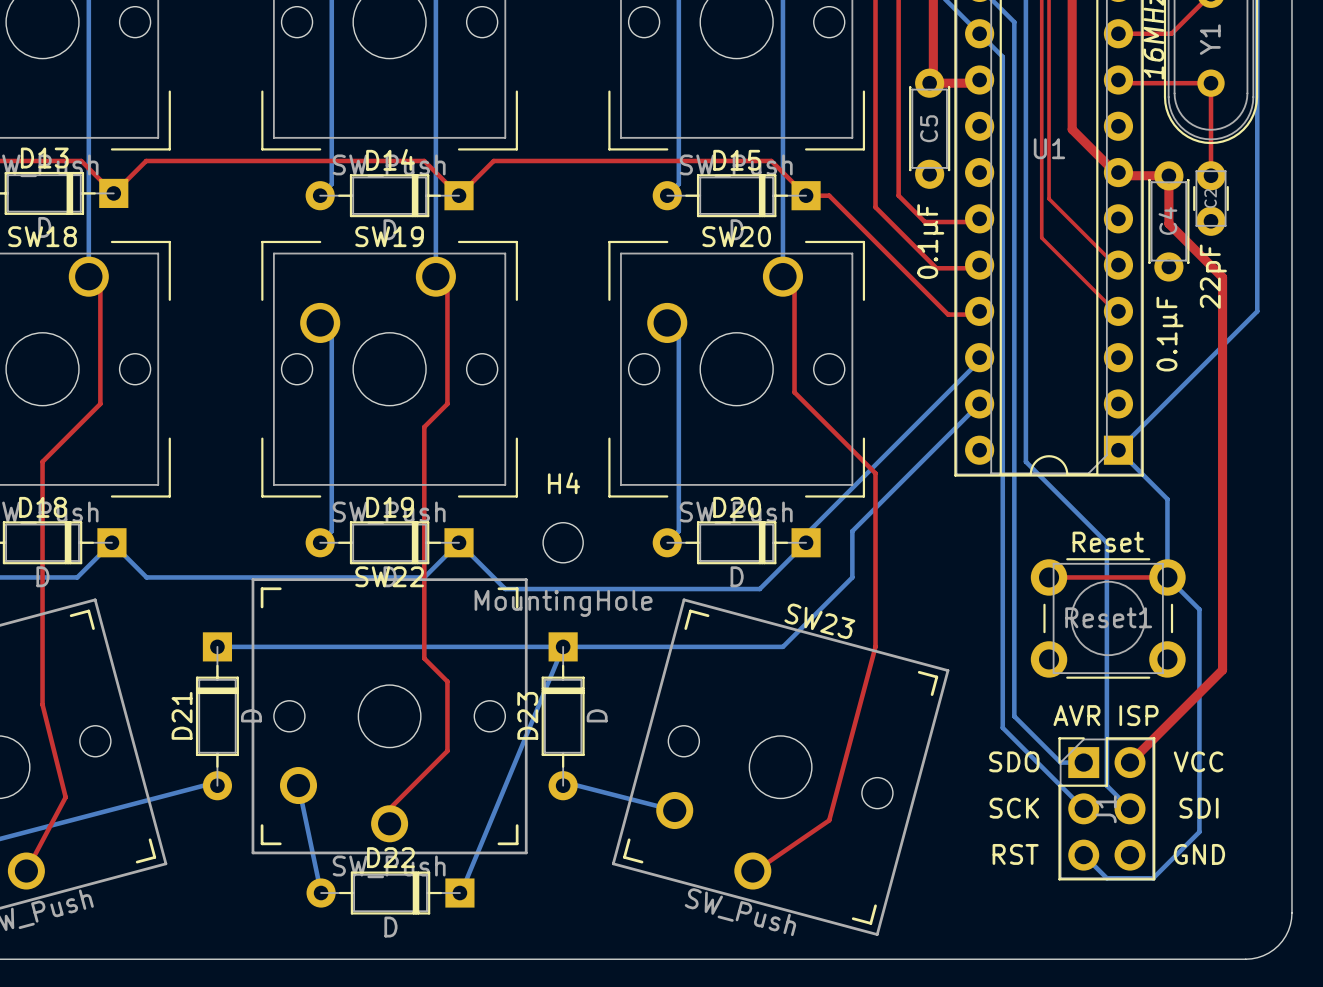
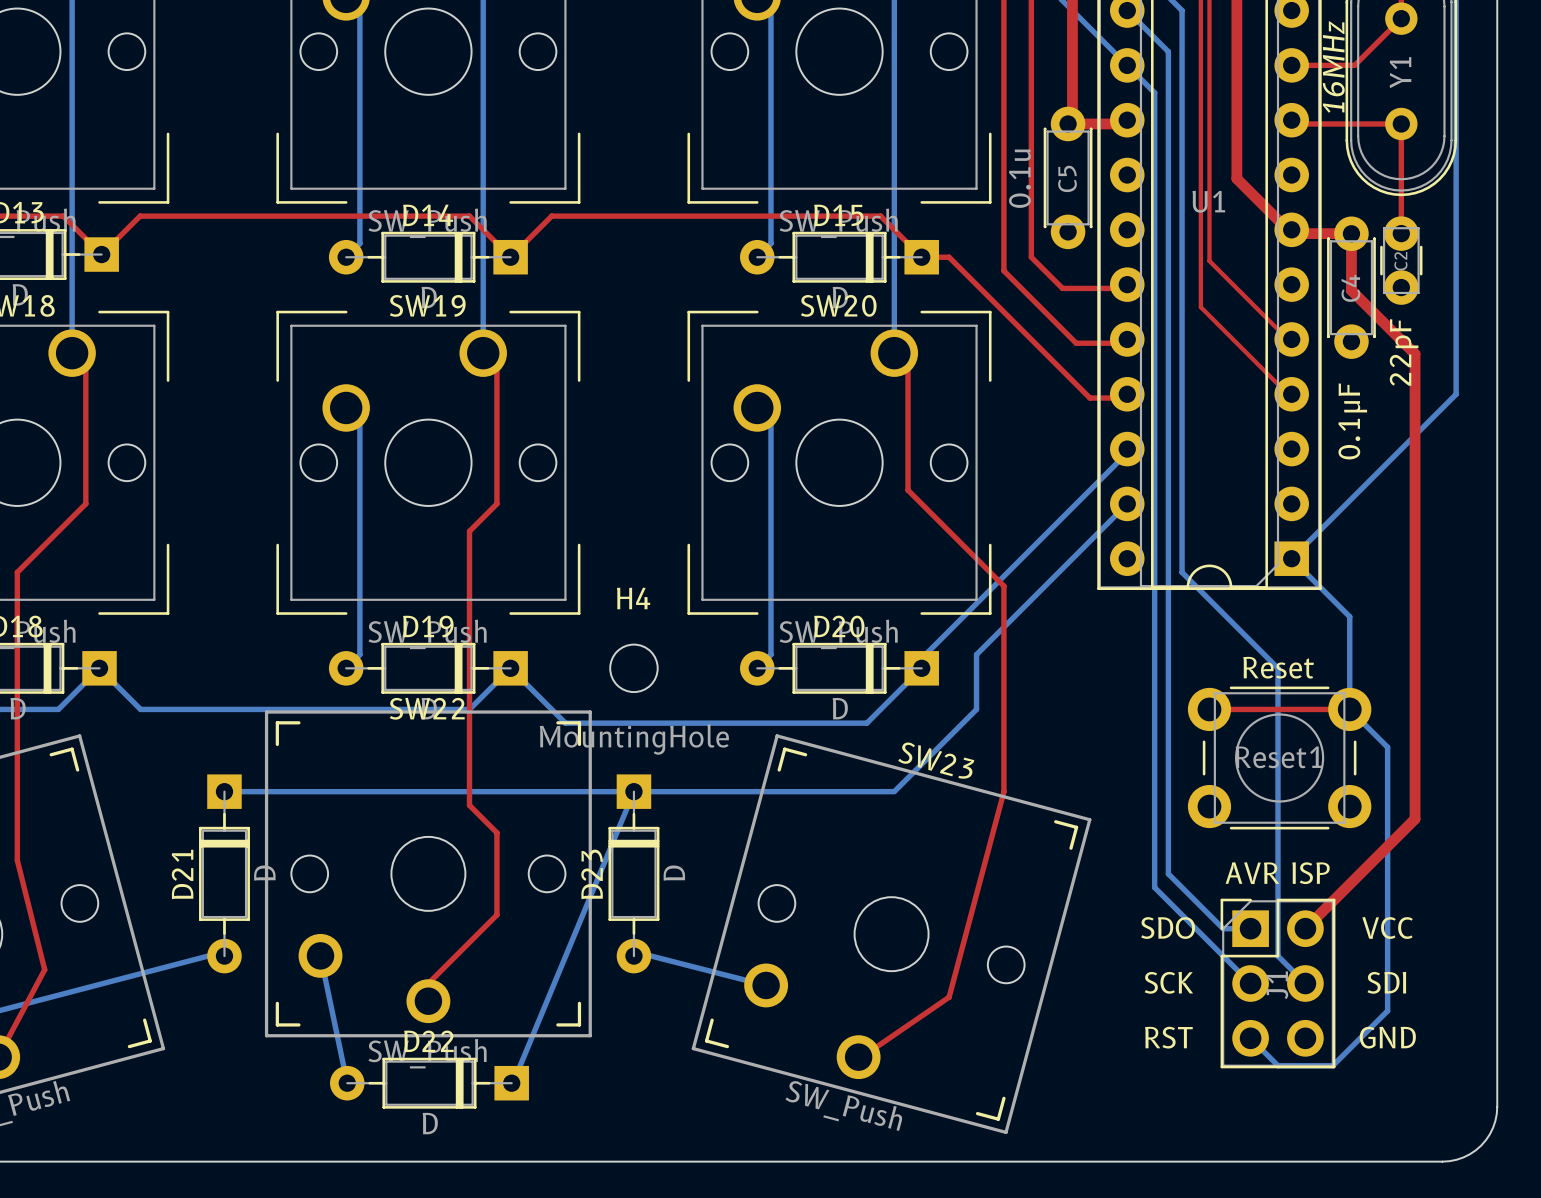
C5 value: 0.1μF (930, 241) -> 0.1u (1019, 178)

